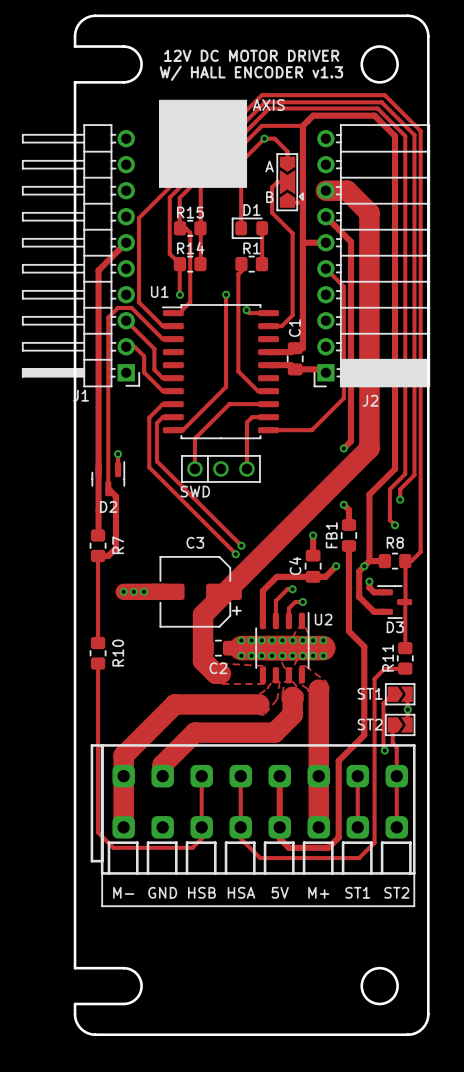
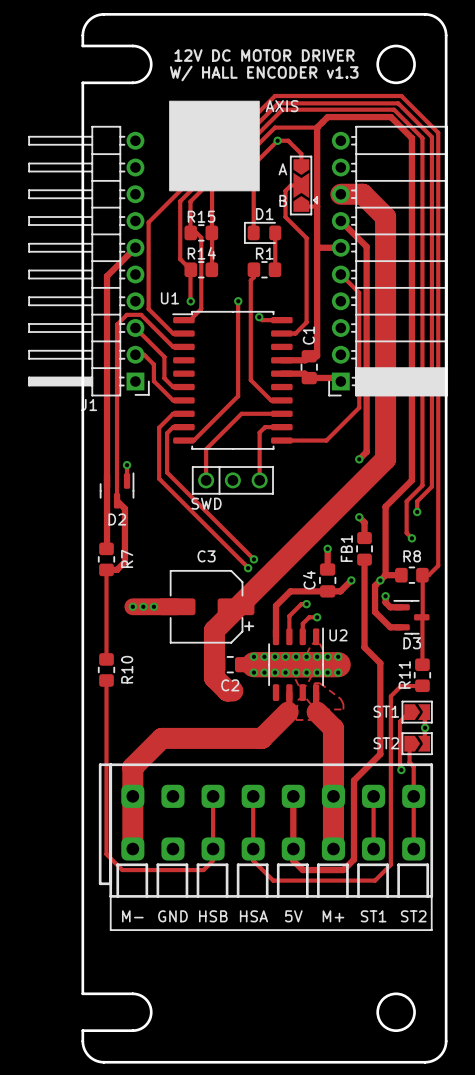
J2 name: J2 (370, 400) -> none
zone outline: (220, 663) (220, 683) (264, 683) (264, 666) (220, 663) -> none
zone outline: (272, 681) (267, 689) (259, 694) (259, 714) (264, 714) (277, 699) (279, 681) (272, 681) -> none
track: (318, 689) (318, 710) -> (316, 692) (316, 711) (333, 728)
track: (292, 696) (292, 714) (274, 732) (194, 732) (162, 764) (162, 776) -> none
track: (259, 704) (174, 704) (123, 755) -> (289, 692) (289, 710) (261, 738) (161, 738) (132, 767) (132, 775)

